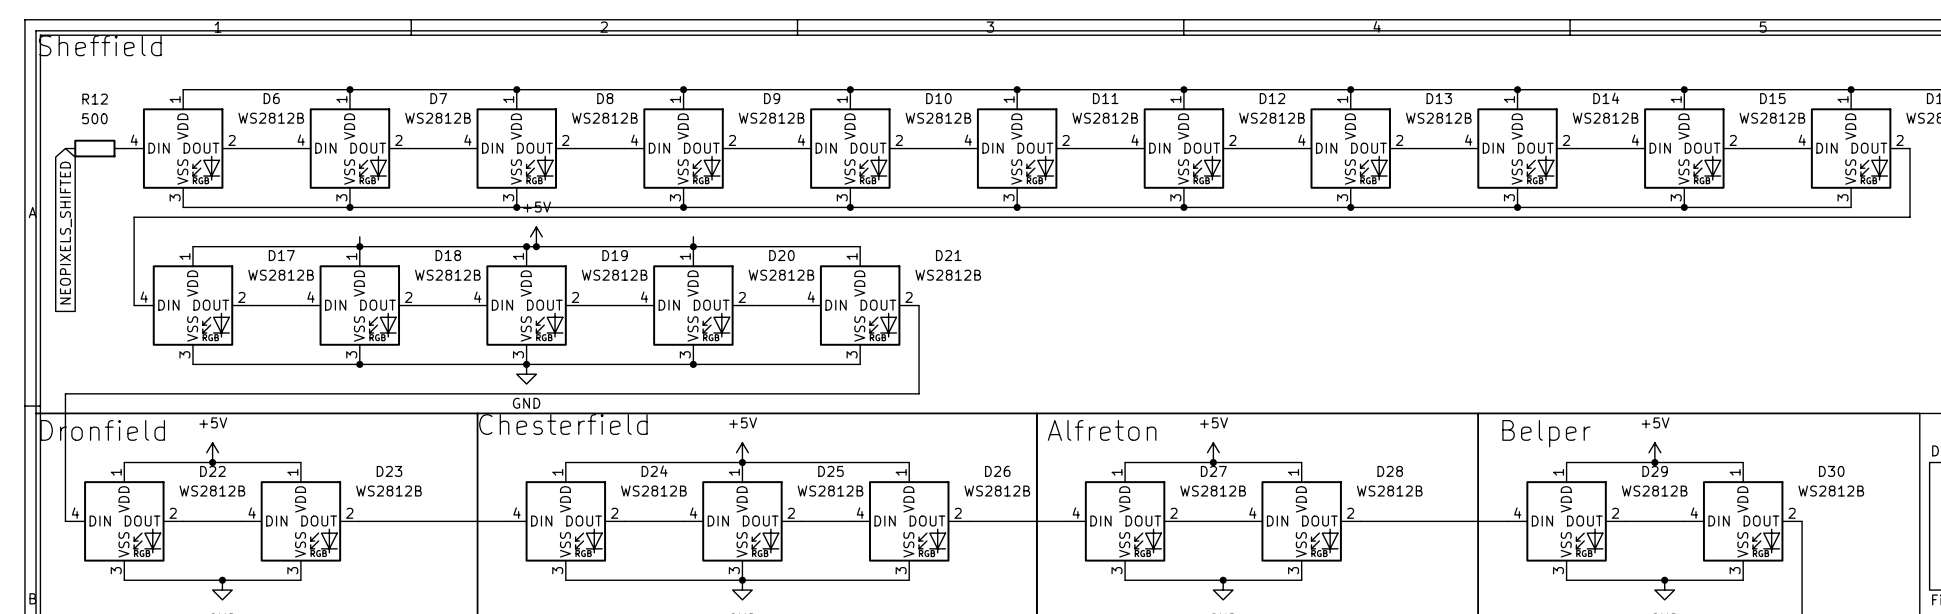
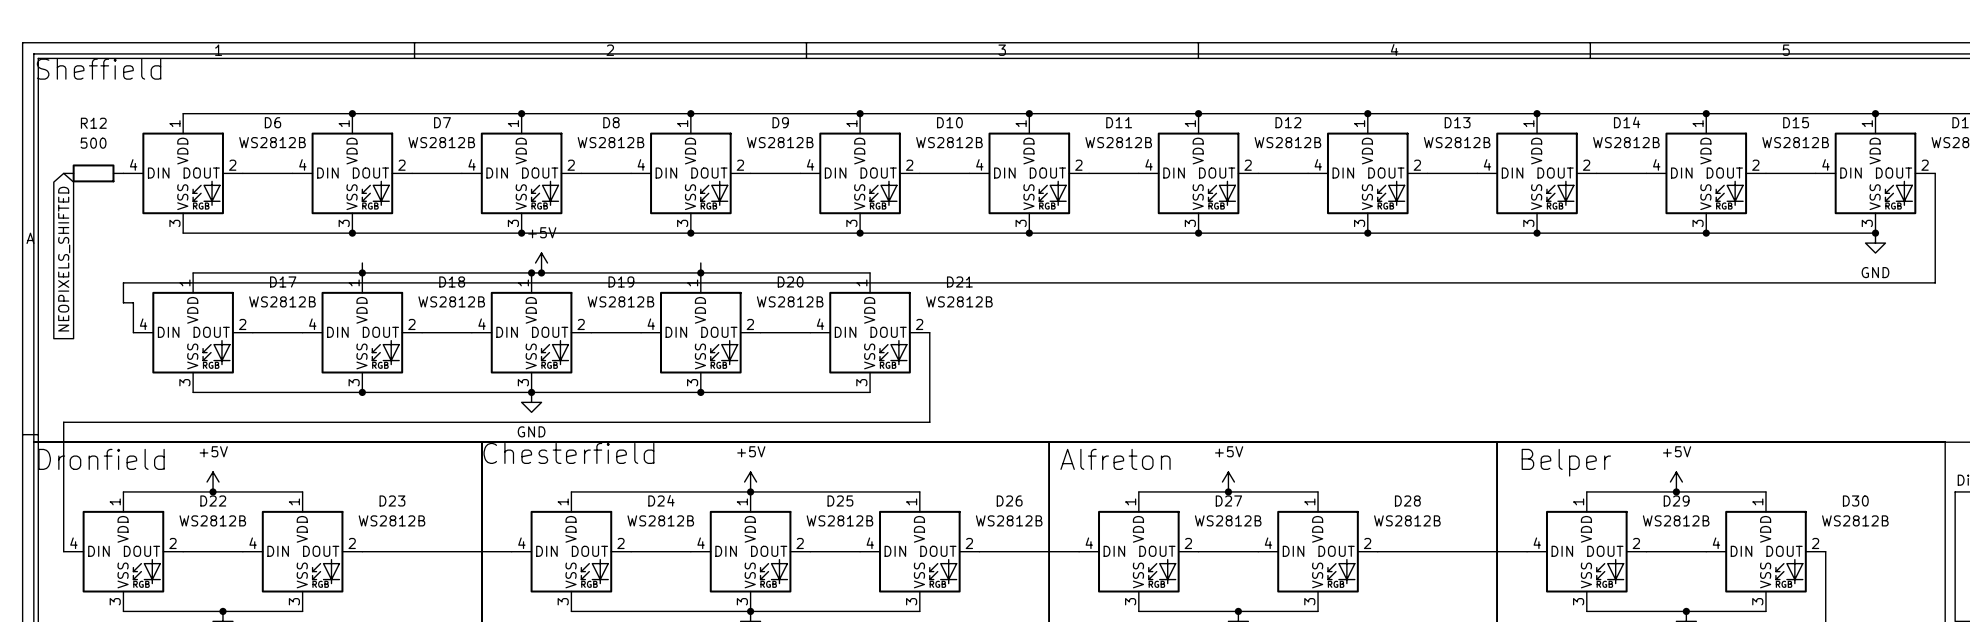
junction: none -> (1875, 233)
power symbol: none -> GND (1875, 243)
wire: (1909, 217) (134, 217) (134, 276) -> (1935, 243) (1935, 282) (123, 282) (123, 302) (133, 302)

